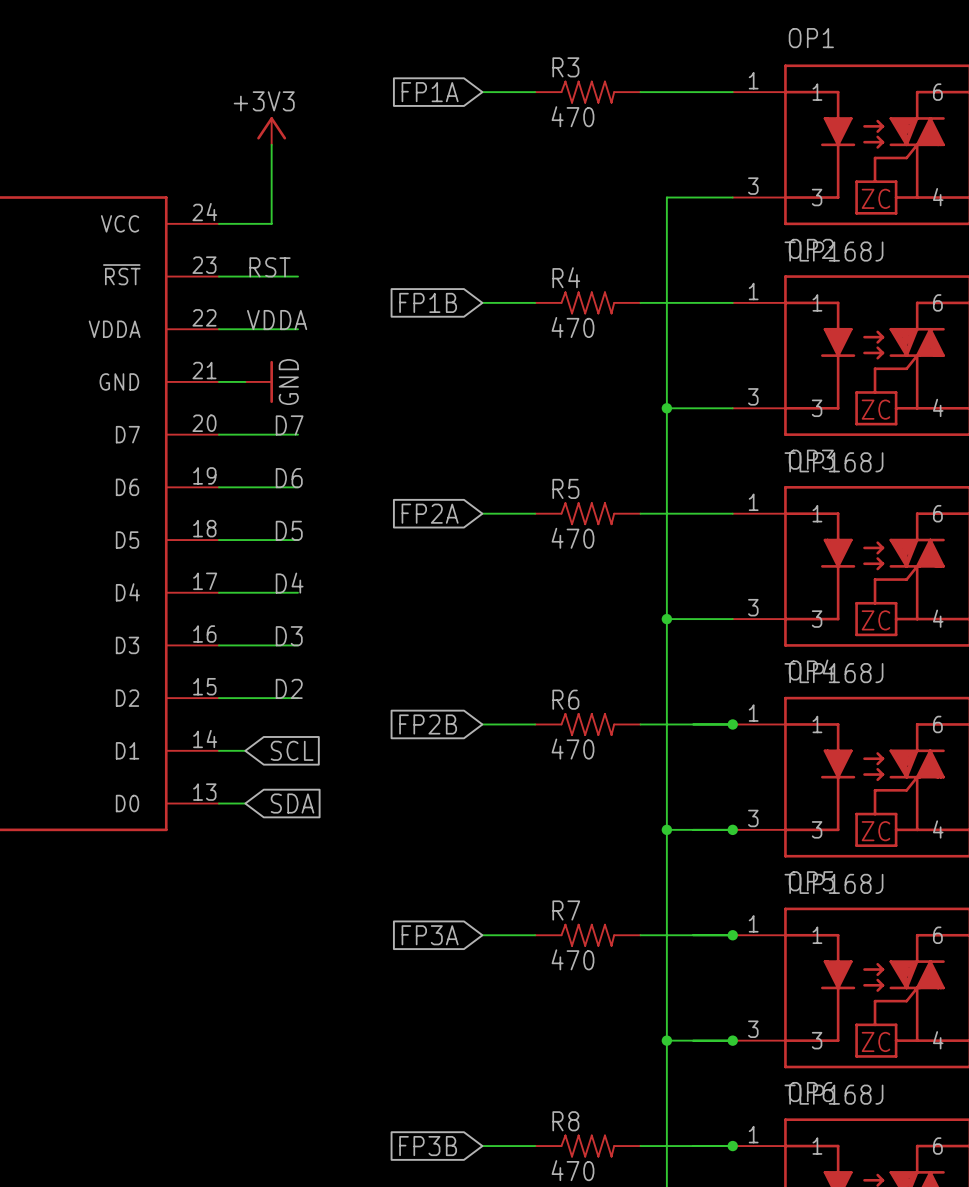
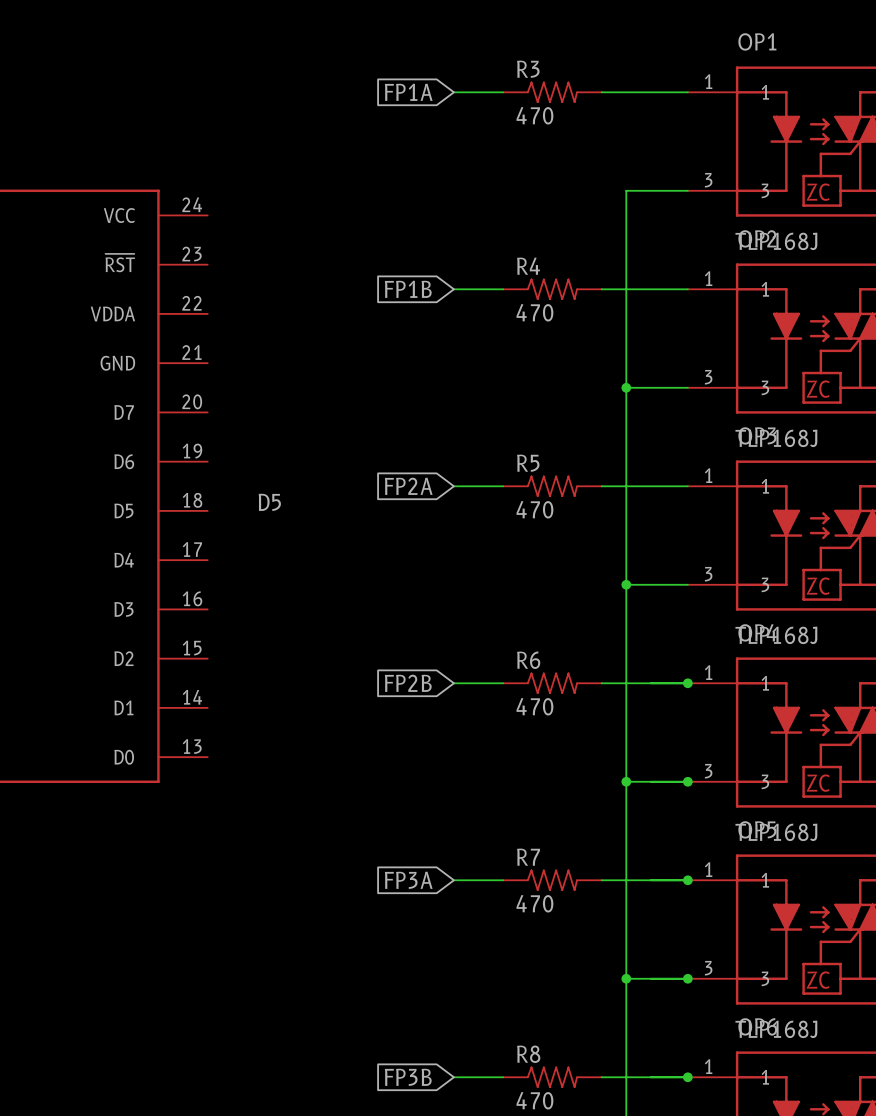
power symbol: +3V3 (271, 130) -> none
wire: (271, 144) (271, 223) (218, 223) -> none
label: RST (269, 267) -> none
wire: (218, 276) (298, 276) -> none
label: VDDA (277, 320) -> none
wire: (218, 329) (298, 329) -> none
wire: (218, 381) (245, 381) -> none
power symbol: GND (259, 381) -> none
label: D7 (289, 425) -> none
wire: (218, 434) (298, 434) -> none
label: D6 (289, 478) -> none
wire: (218, 487) (298, 487) -> none
wire: (218, 540) (298, 540) -> none
label: D4 (289, 583) -> none
wire: (218, 592) (298, 592) -> none
label: D3 (289, 636) -> none
wire: (218, 645) (298, 645) -> none
label: D2 (289, 688) -> none
wire: (218, 698) (298, 698) -> none
wire: (218, 750) (245, 750) -> none
global label: SCL (292, 750) -> none
wire: (218, 803) (245, 803) -> none
global label: SDA (292, 803) -> none

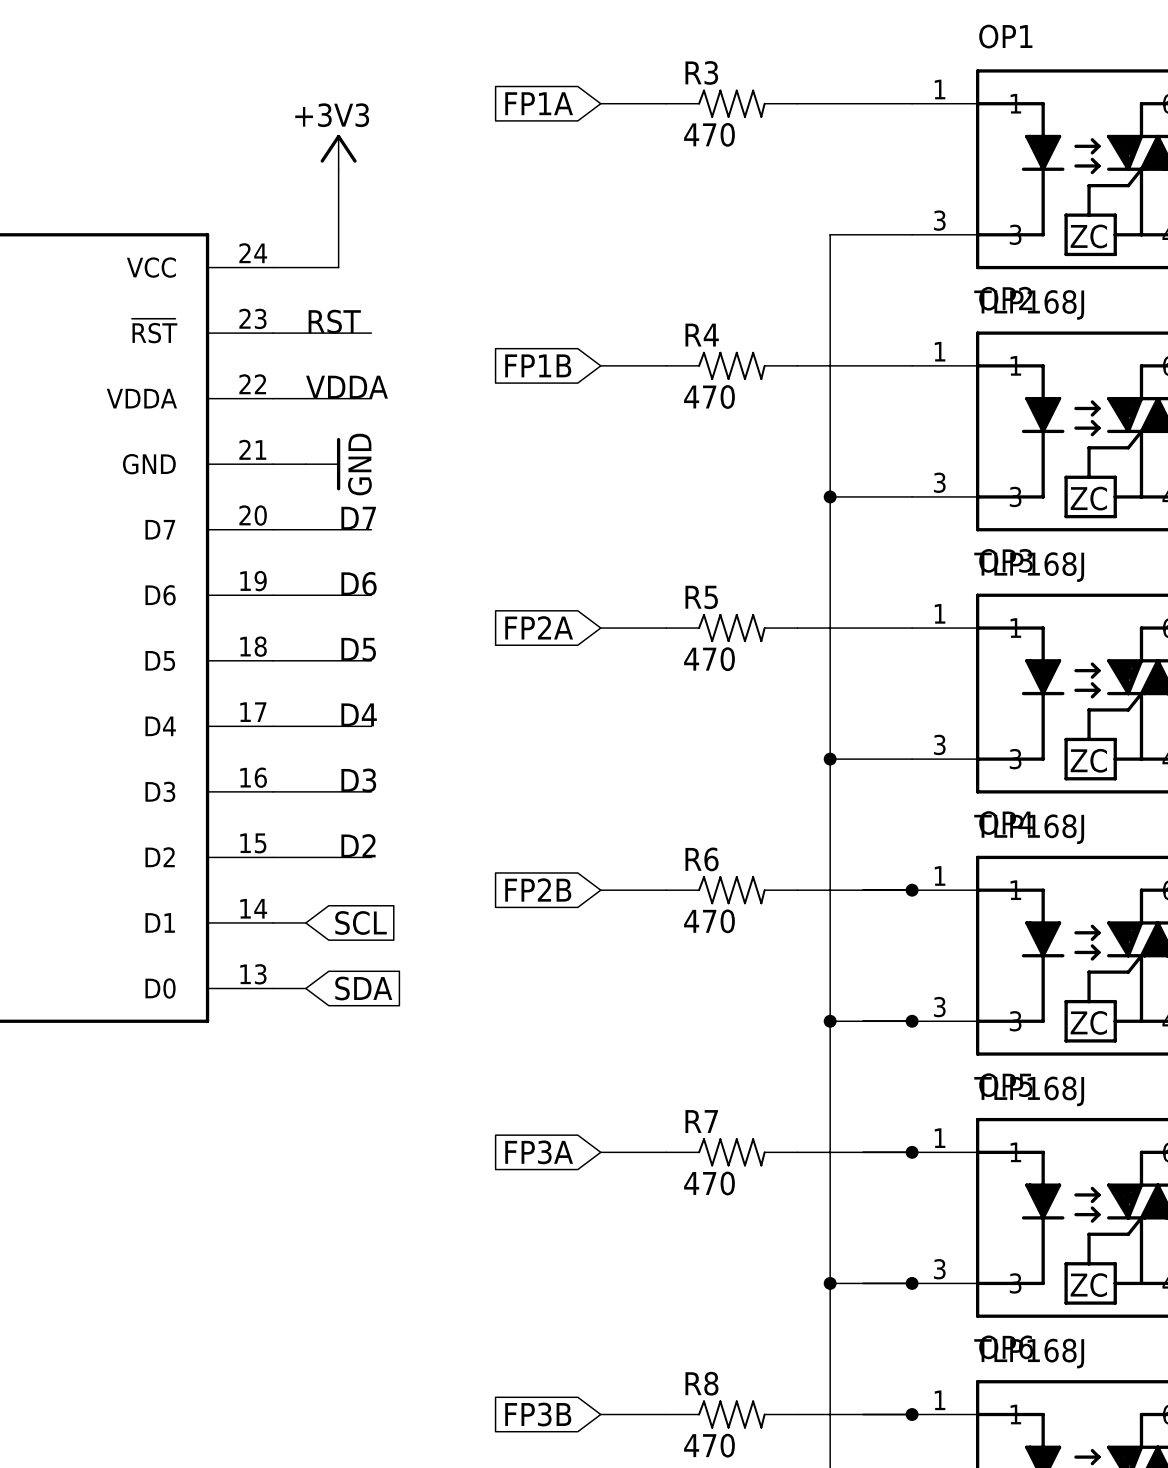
power symbol: none -> +3V3 (338, 152)
wire: none -> (338, 169) (338, 267) (273, 267)
label: none -> RST (334, 321)
wire: none -> (273, 333) (371, 333)
label: none -> VDDA (347, 387)
wire: none -> (273, 398) (371, 398)
wire: none -> (273, 464) (305, 464)
power symbol: none -> GND (323, 464)
label: none -> D7 (358, 518)
wire: none -> (273, 529) (371, 529)
label: none -> D6 (359, 583)
wire: none -> (273, 595) (371, 595)
wire: none -> (273, 660) (371, 660)
label: none -> D4 (359, 714)
wire: none -> (273, 726) (371, 726)
label: none -> D3 (358, 780)
wire: none -> (273, 791) (371, 791)
label: none -> D2 (358, 845)
wire: none -> (273, 857) (371, 857)
wire: none -> (273, 922) (305, 922)
global label: none -> SCL (360, 922)
wire: none -> (273, 988) (305, 988)
global label: none -> SDA (363, 988)

